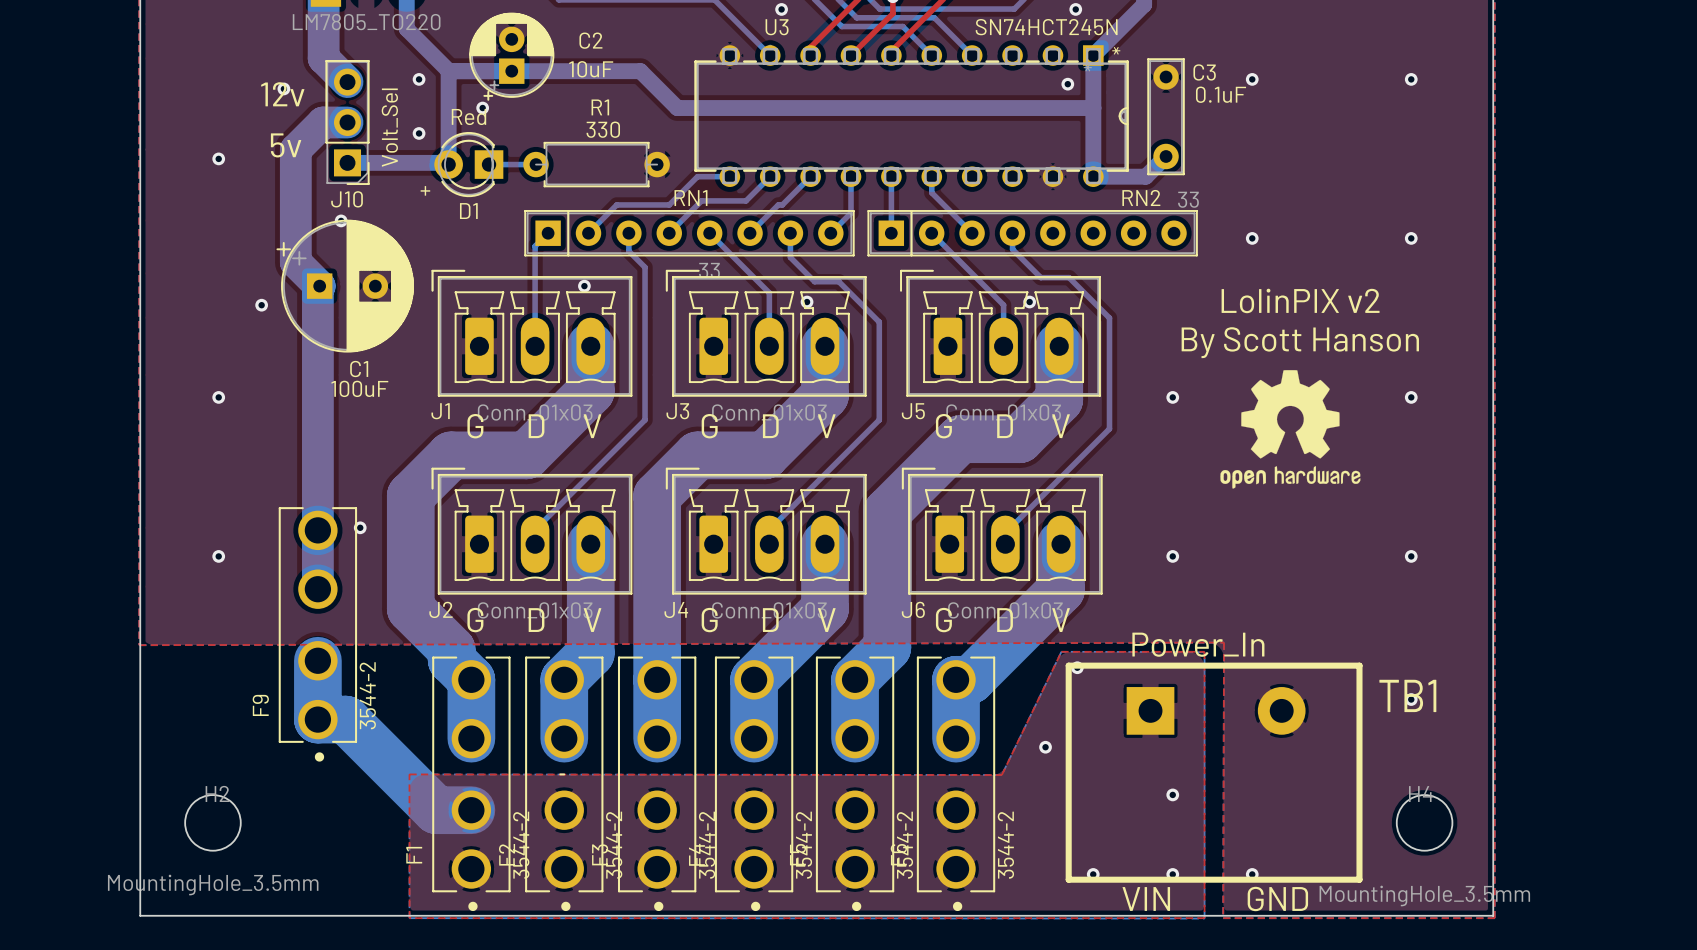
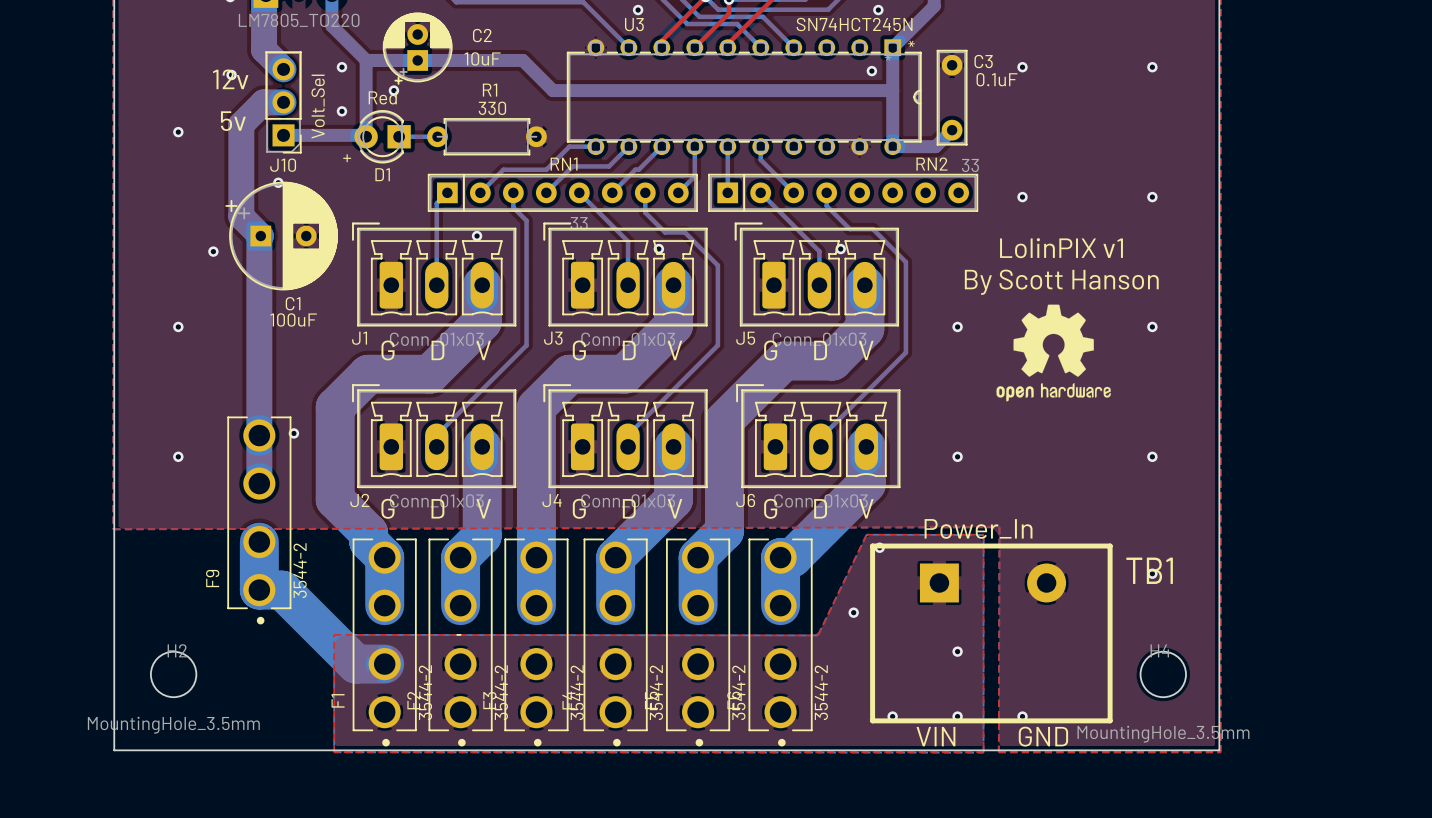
text: LolinPIX v2 (1300, 300) -> LolinPIX v1 (1061, 248)

